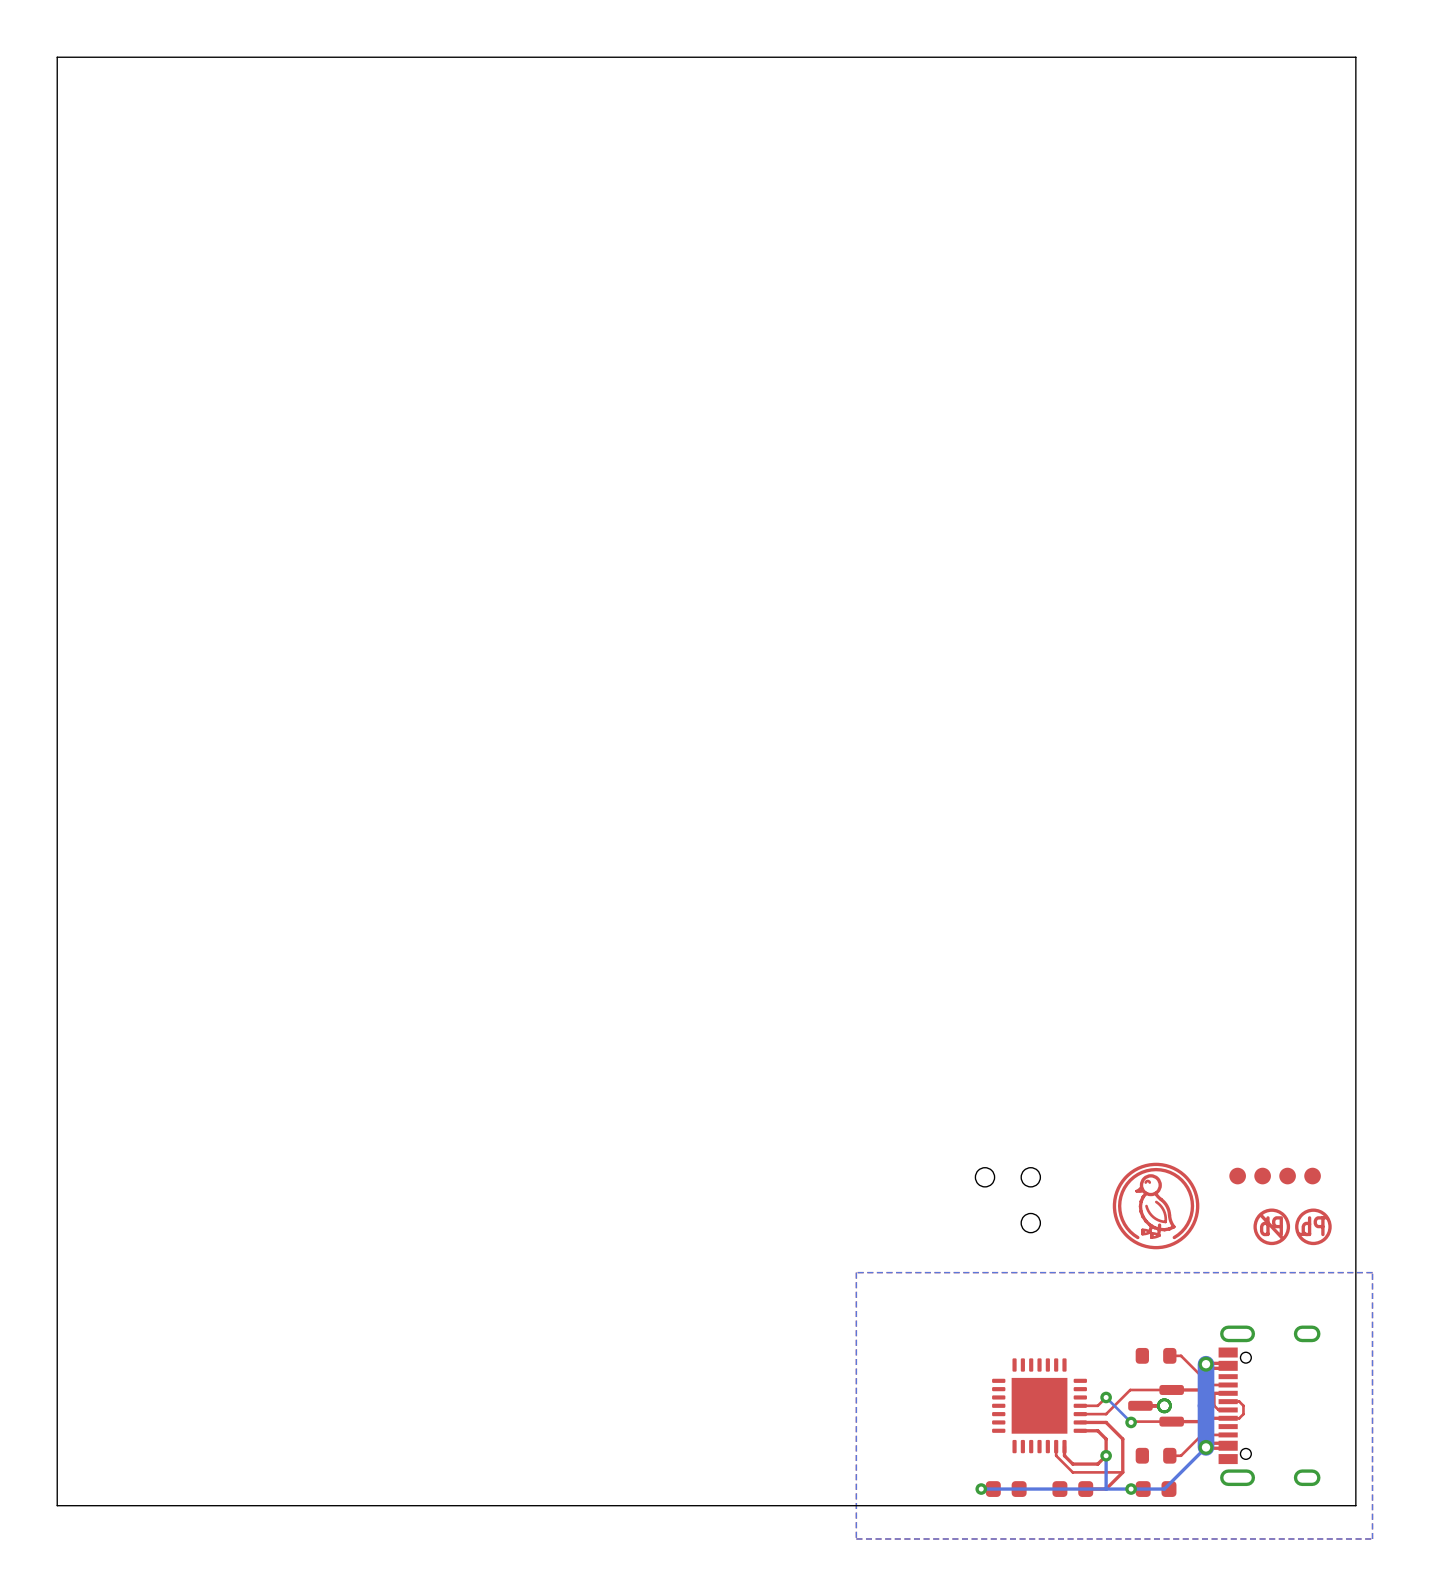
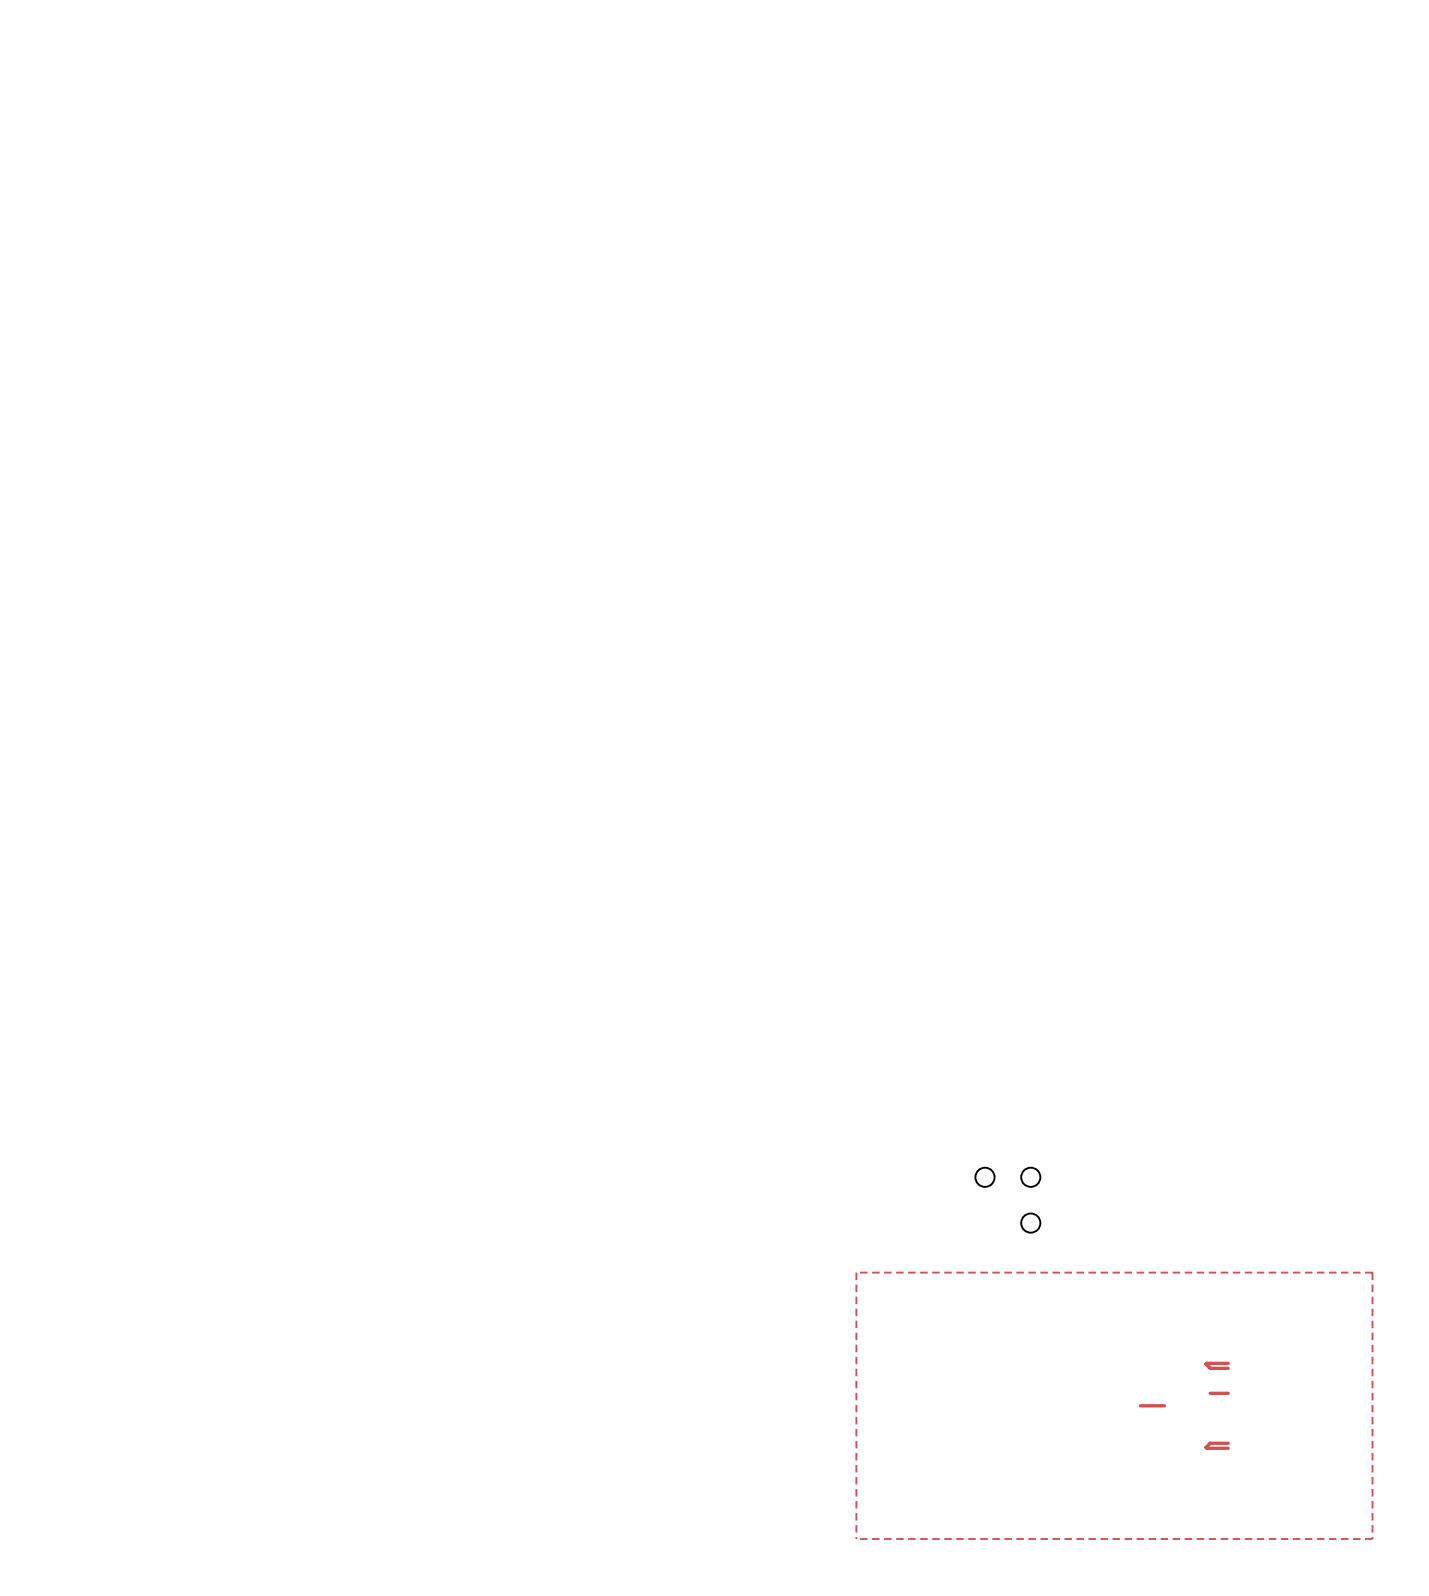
board edge: (1355, 57) (57, 57) (57, 1505) (1355, 1505) (1355, 57) -> none
drawing: [1112, 1162, 1200, 1250] -> none
drawing: [1229, 1167, 1321, 1185] -> none
drawing: [1253, 1208, 1332, 1246] -> none
bottom zone outline: (1372, 1272) (1372, 1538) (856, 1538) (856, 1272) (1372, 1272) -> none
part: (1156, 1355) -> none
top track: (1169, 1355) (1181, 1355) (1210, 1384) (1228, 1384) -> none
bottom track: (1206, 1364) (1206, 1447) (1164, 1489) (981, 1489) -> none
via: (1206, 1364) -> none
top track: (1210, 1393) (1206, 1389) (1130, 1389) (1106, 1414) (1080, 1414) -> none
top track: (1214, 1393) (1214, 1405) (1218, 1409) (1228, 1409) -> none
top track: (1106, 1397) (1097, 1405) (1080, 1405) -> none
bottom track: (1106, 1397) (1131, 1422) -> none
via: (1106, 1397) -> none
top track: (1228, 1401) (1239, 1401) (1243, 1405) (1243, 1414) (1239, 1418) (1210, 1418) (1206, 1421) (1131, 1422) -> none
part: (1039, 1405) -> none
part: (1156, 1405) -> none
via: (1164, 1405) -> none
part: (1269, 1405) -> none
top track: (1080, 1422) (1106, 1422) (1122, 1439) (1122, 1472) -> none
via: (1131, 1422) -> none
top track: (1080, 1430) (1097, 1430) (1106, 1439) (1106, 1455) (1097, 1464) (1072, 1464) (1064, 1455) (1064, 1446) -> none
top track: (1228, 1434) (1201, 1434) (1181, 1455) (1169, 1455) -> none
top track: (1056, 1446) (1056, 1455) (1072, 1472) (1122, 1472) -> none
via: (1206, 1447) -> none
bottom track: (1106, 1455) (1106, 1489) -> none
via: (1106, 1455) -> none
part: (1156, 1455) -> none
top track: (1122, 1472) (1106, 1489) (1085, 1489) -> none
via: (981, 1489) -> none
part: (1006, 1489) -> none
part: (1072, 1489) -> none
via: (1131, 1489) -> none
part: (1156, 1489) -> none

